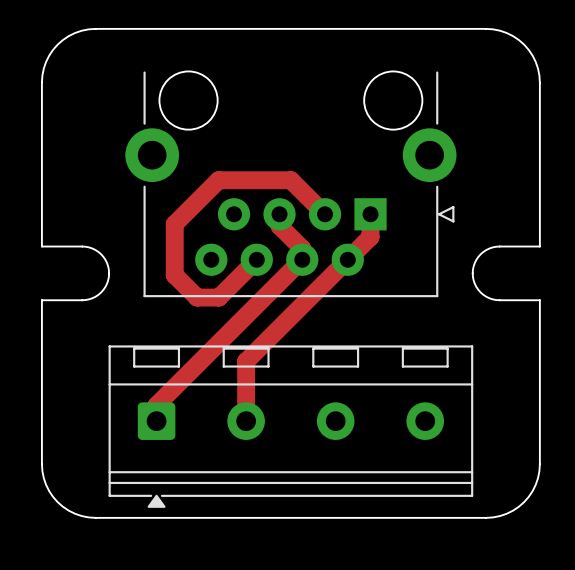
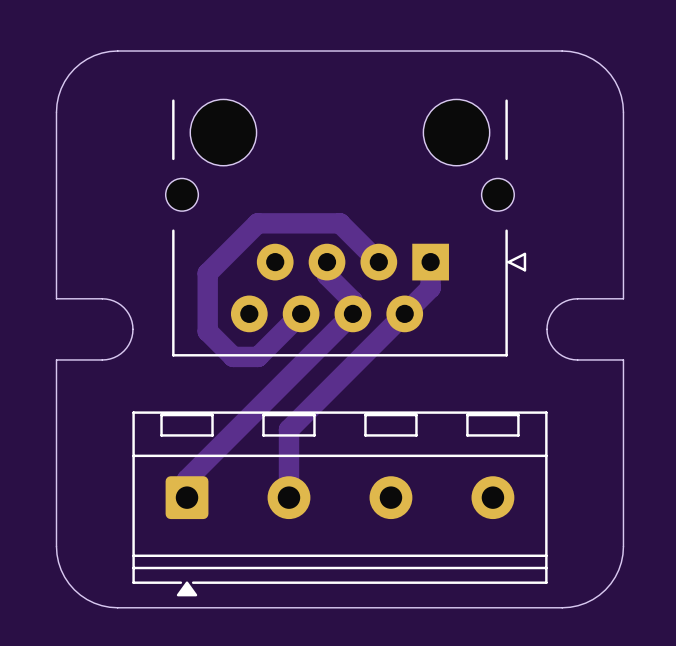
part footprint: [125, 71, 457, 298] -> [165, 99, 527, 357]

